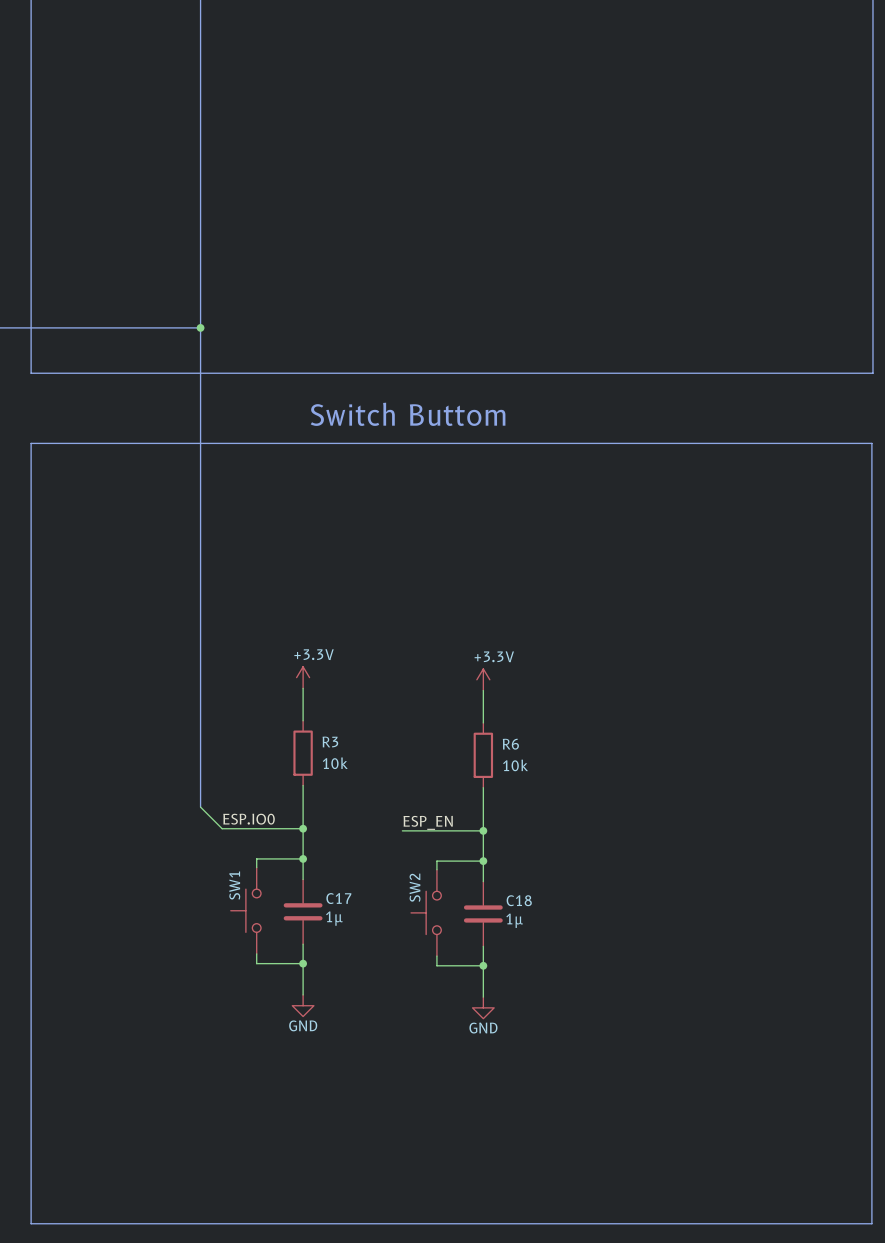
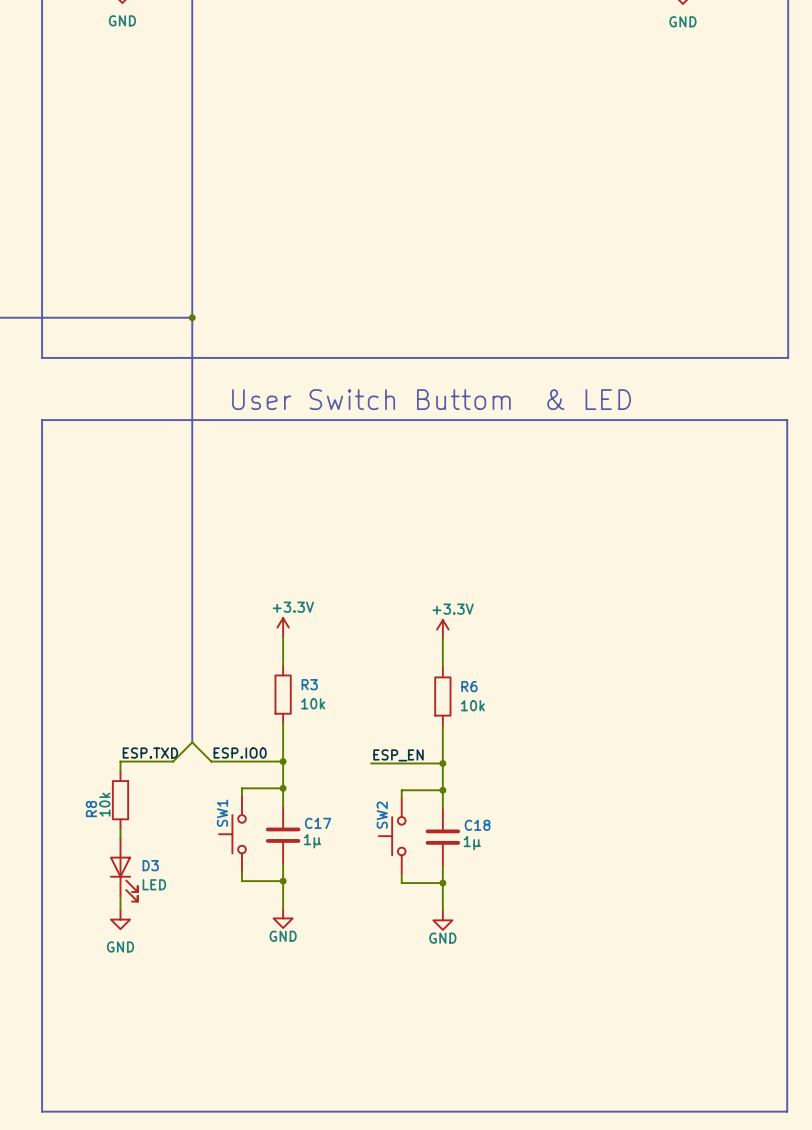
text: Switch Buttom (408, 414) -> User Switch Buttom & LED (431, 399)
wire: none -> (192, 742) (173, 761) (120, 761) (120, 771)
label: none -> ESP.TXD (150, 753)
R8: none -> 10k (120, 800)
wire: none -> (120, 828) (120, 838)
D3: none -> LED (123, 870)
wire: none -> (120, 895) (120, 910)
power symbol: none -> GND (120, 919)

